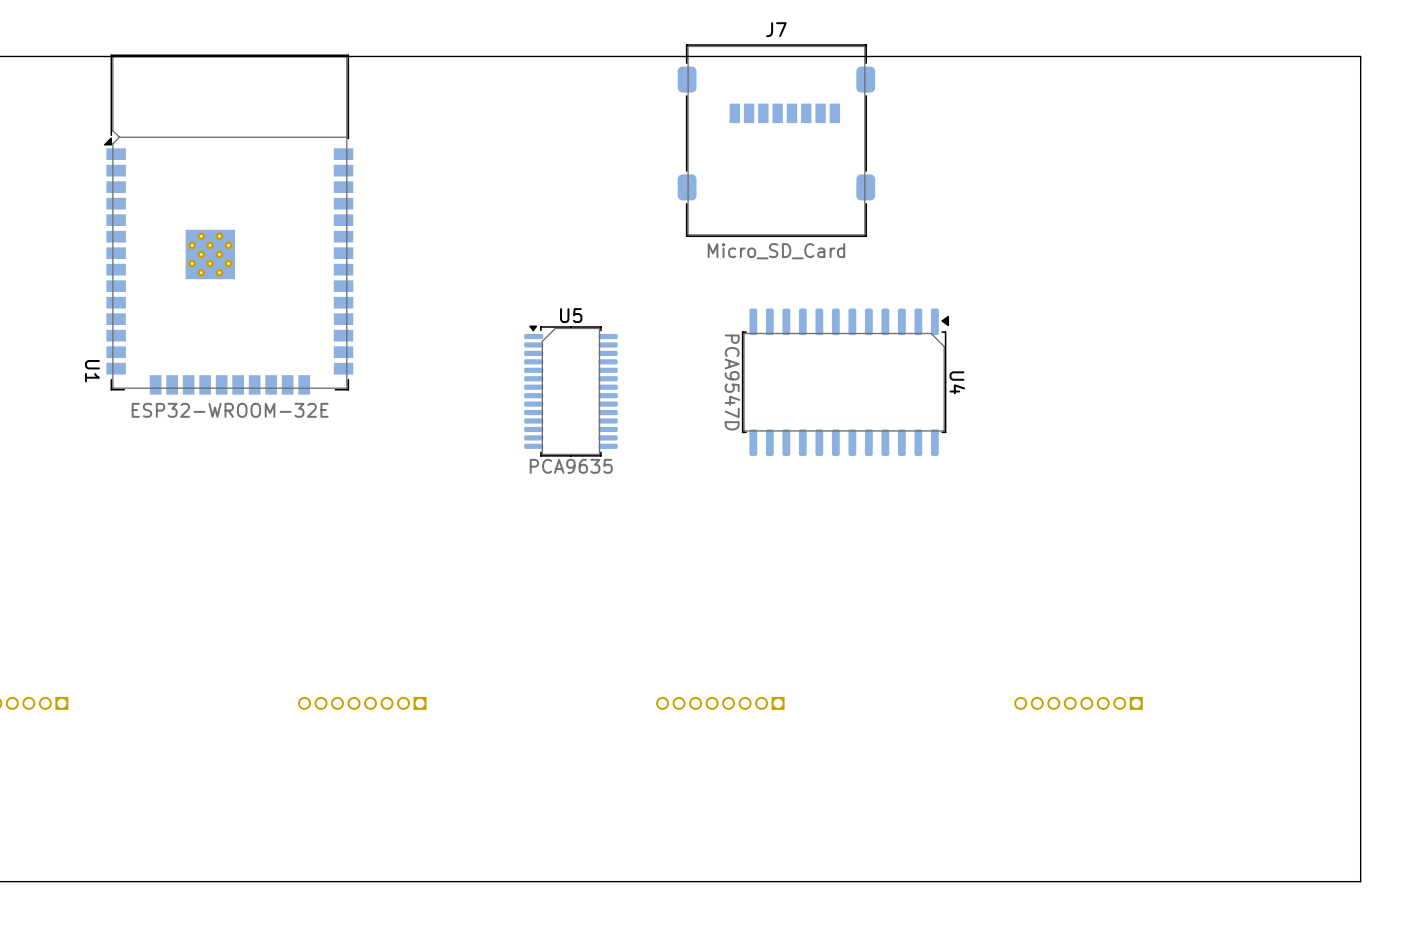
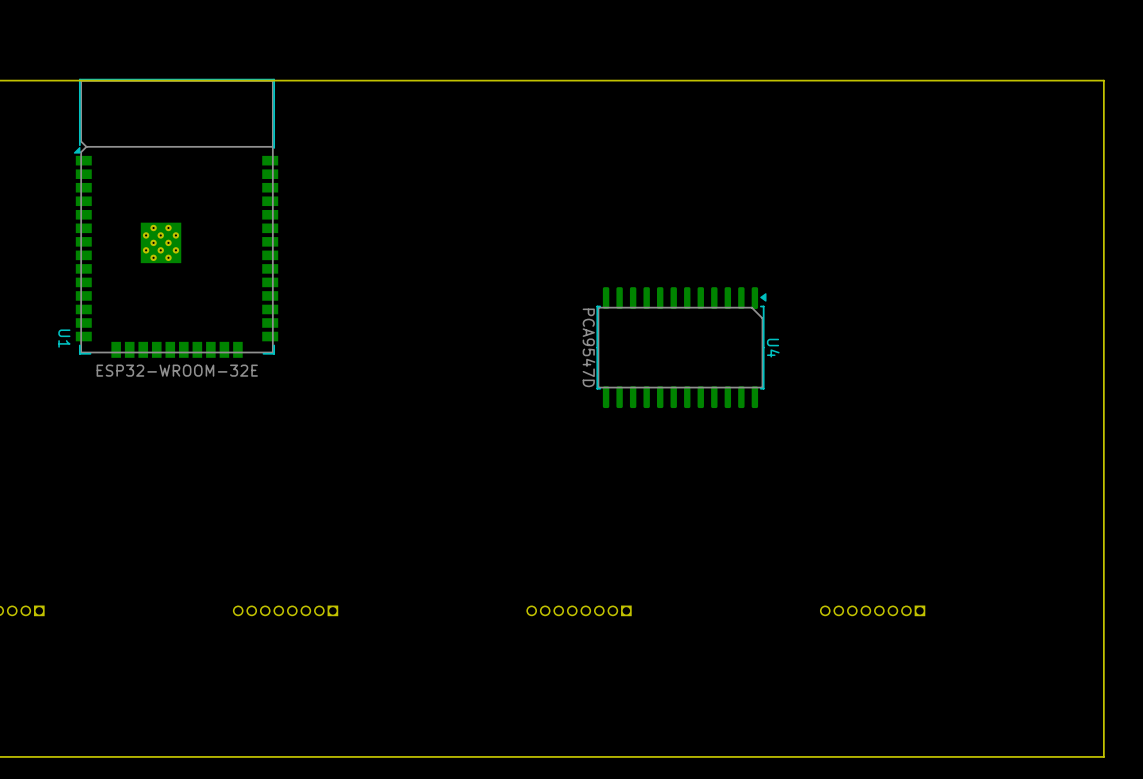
J7: Micro_SD_Card (776, 140) -> none
U5: PCA9635 (570, 391) -> none

